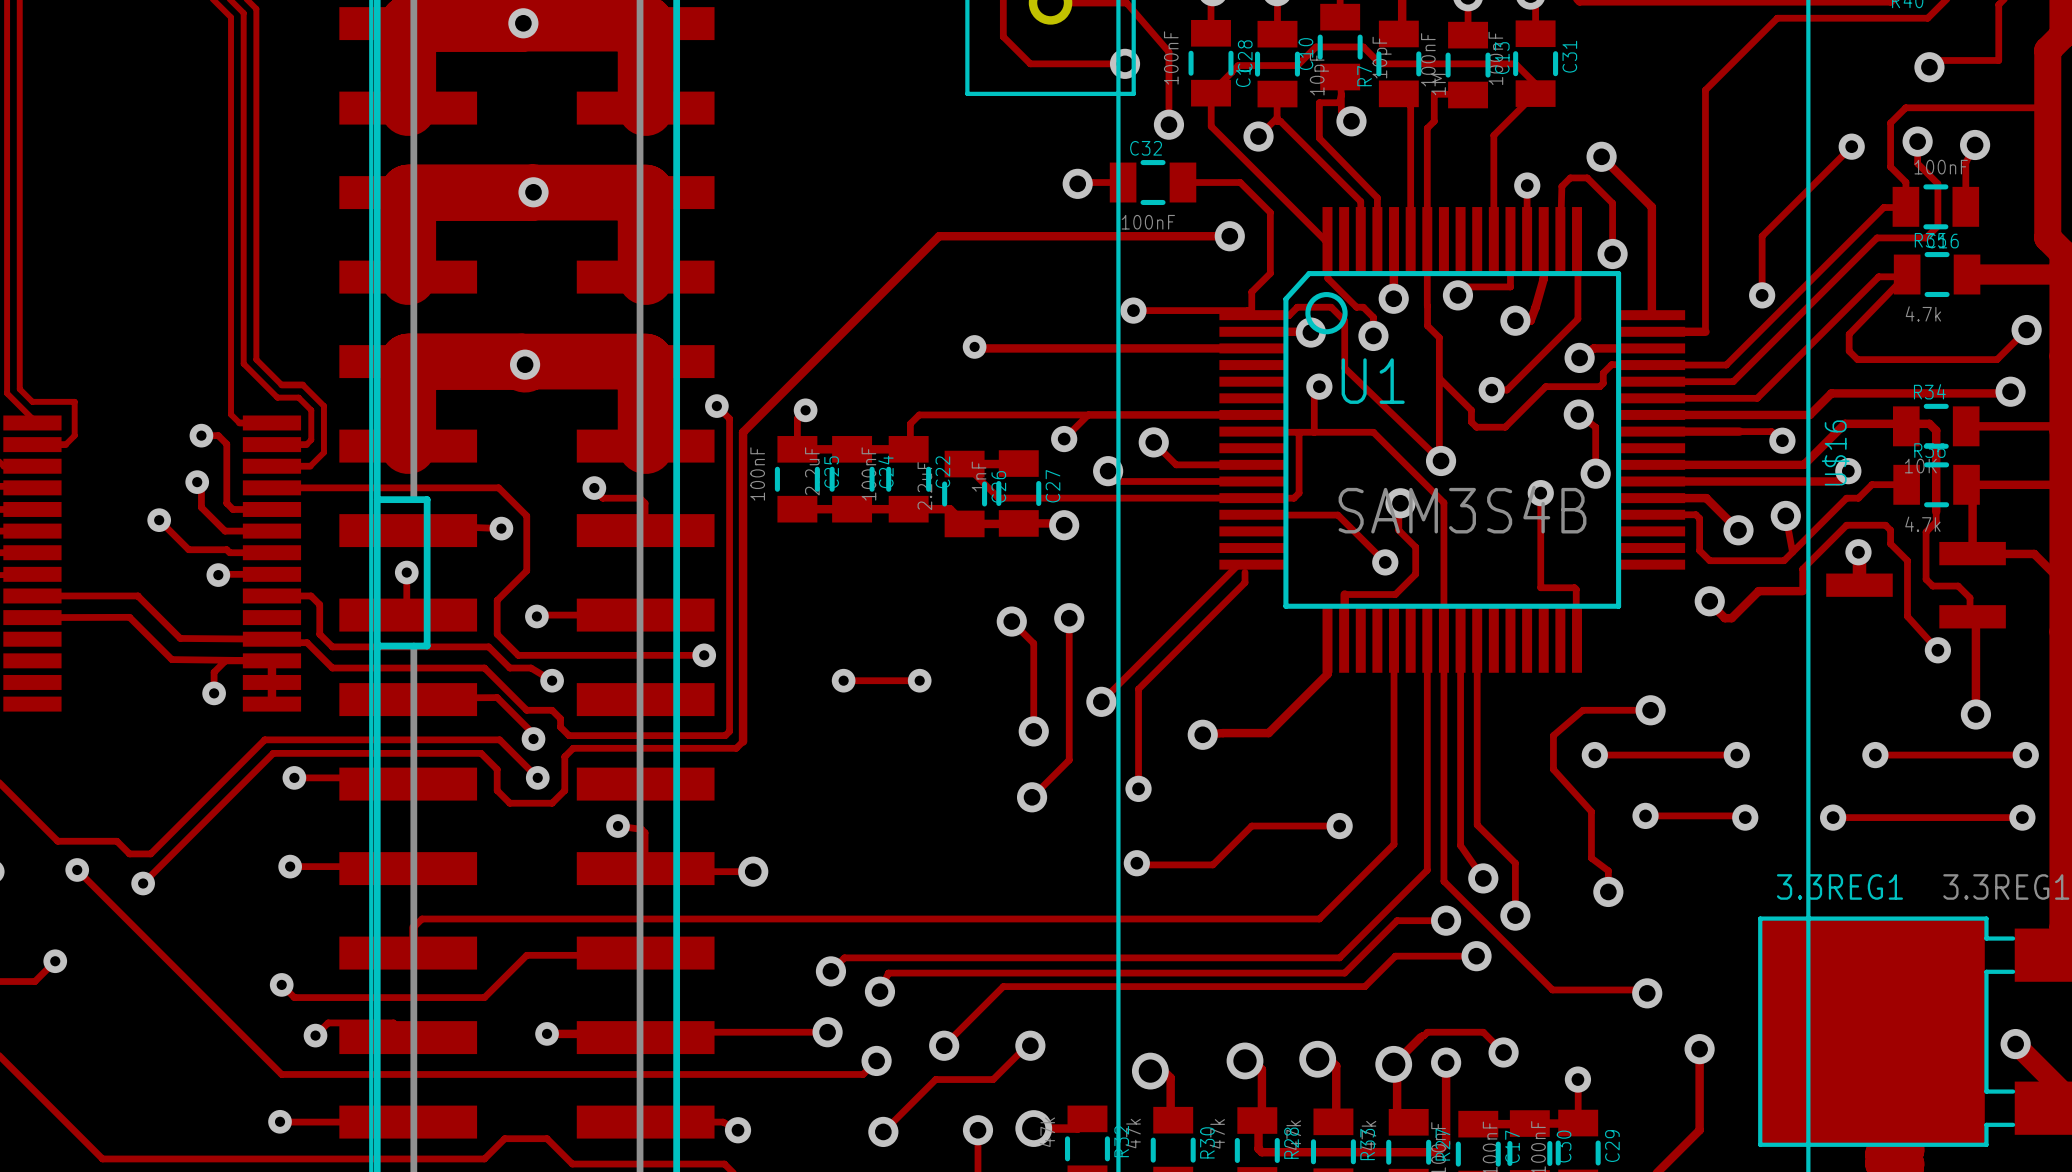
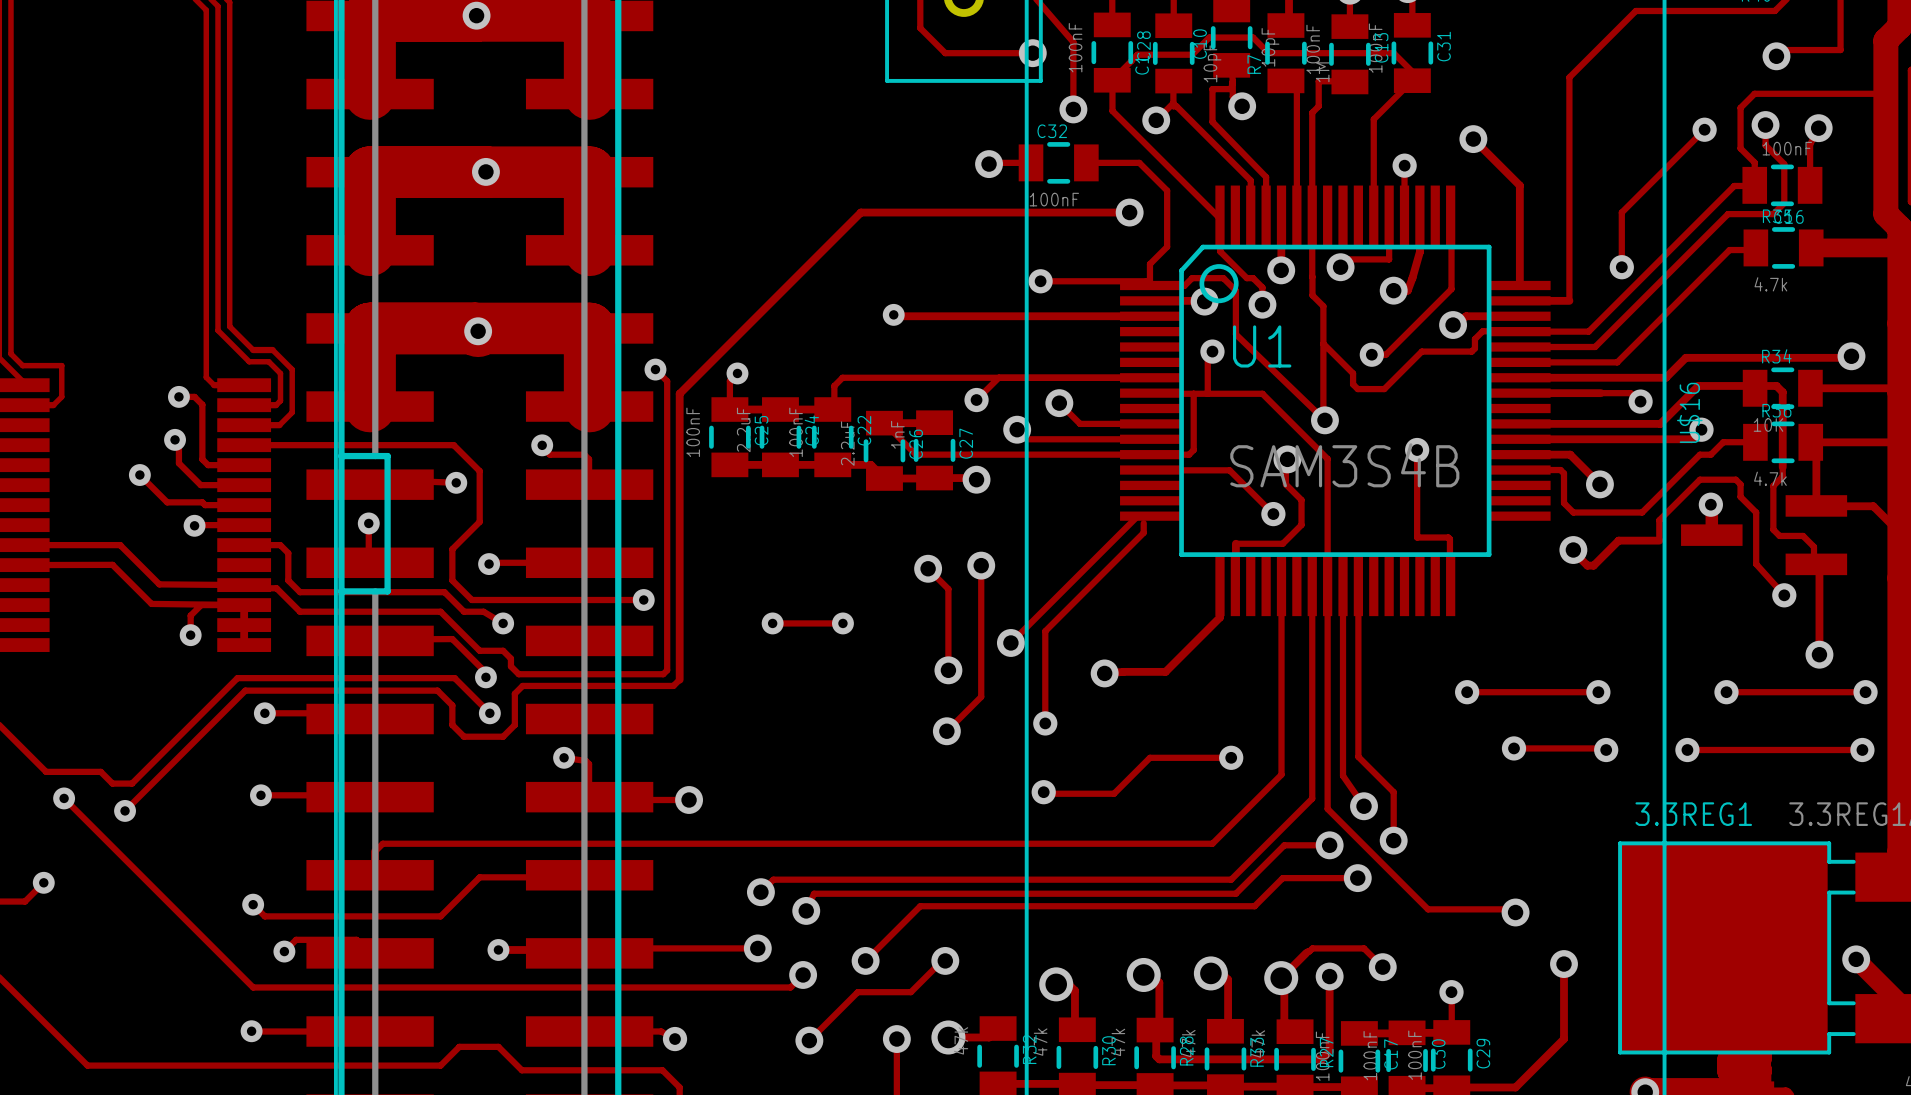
track: (1560, 240) (1561, 186) (1570, 177) (1587, 177) (1612, 203) (1612, 253) -> none
via: (1612, 253) -> none
track: (1907, 274) (1849, 334) (1849, 351) (1857, 359) (1997, 359) (2026, 330) -> none
via: (2026, 330) -> none
track: (1578, 414) (1595, 427) (1595, 473) -> none
via: (1578, 414) -> none
via: (1595, 473) -> none
track: (1785, 515) (1792, 552) -> none
via: (1785, 515) -> none
track: (1650, 710) (1583, 710) (1553, 735) (1553, 769) (1591, 811) (1591, 858) (1608, 870) (1608, 891) -> none
via: (1650, 710) -> none
via: (1608, 891) -> none

